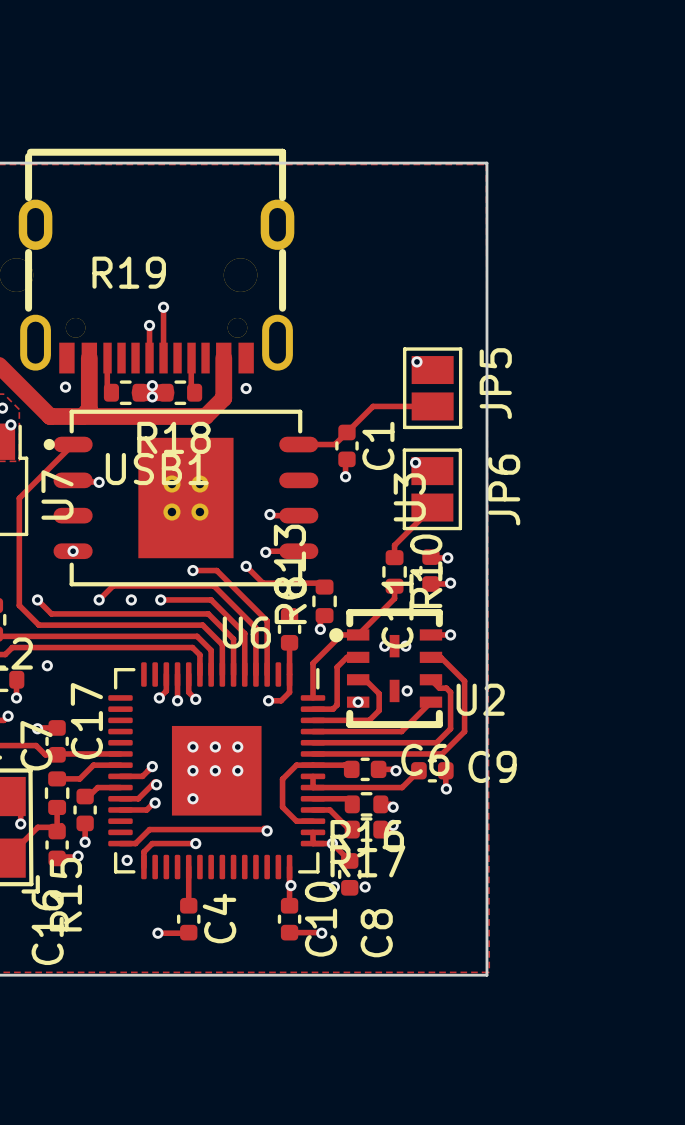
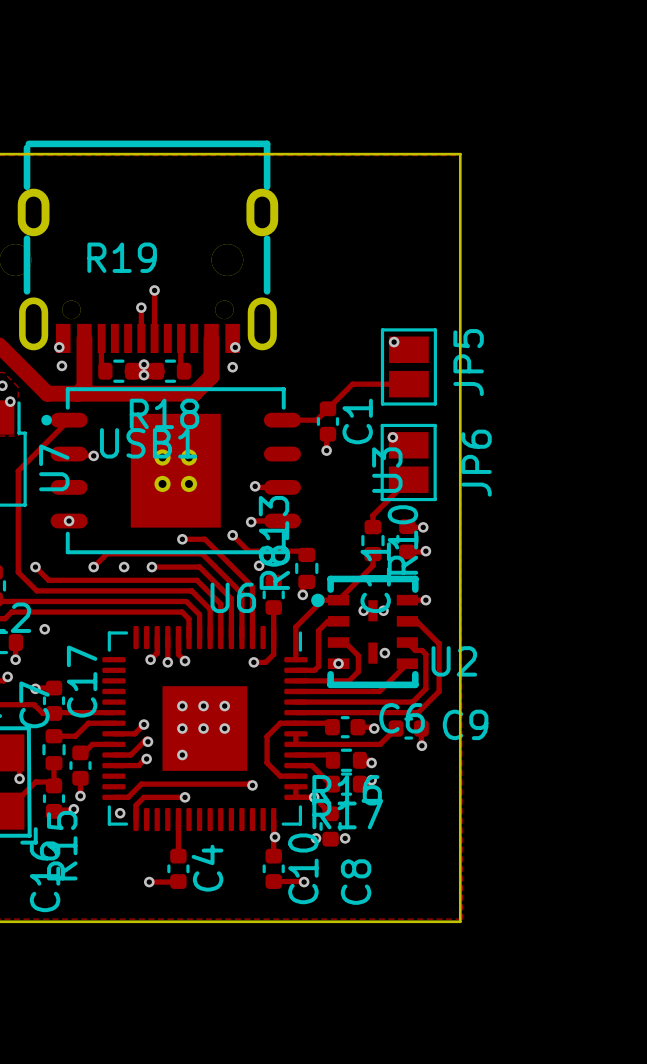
via: none -> (59, 347)
via: none -> (235, 347)
via: none -> (259, 565)

